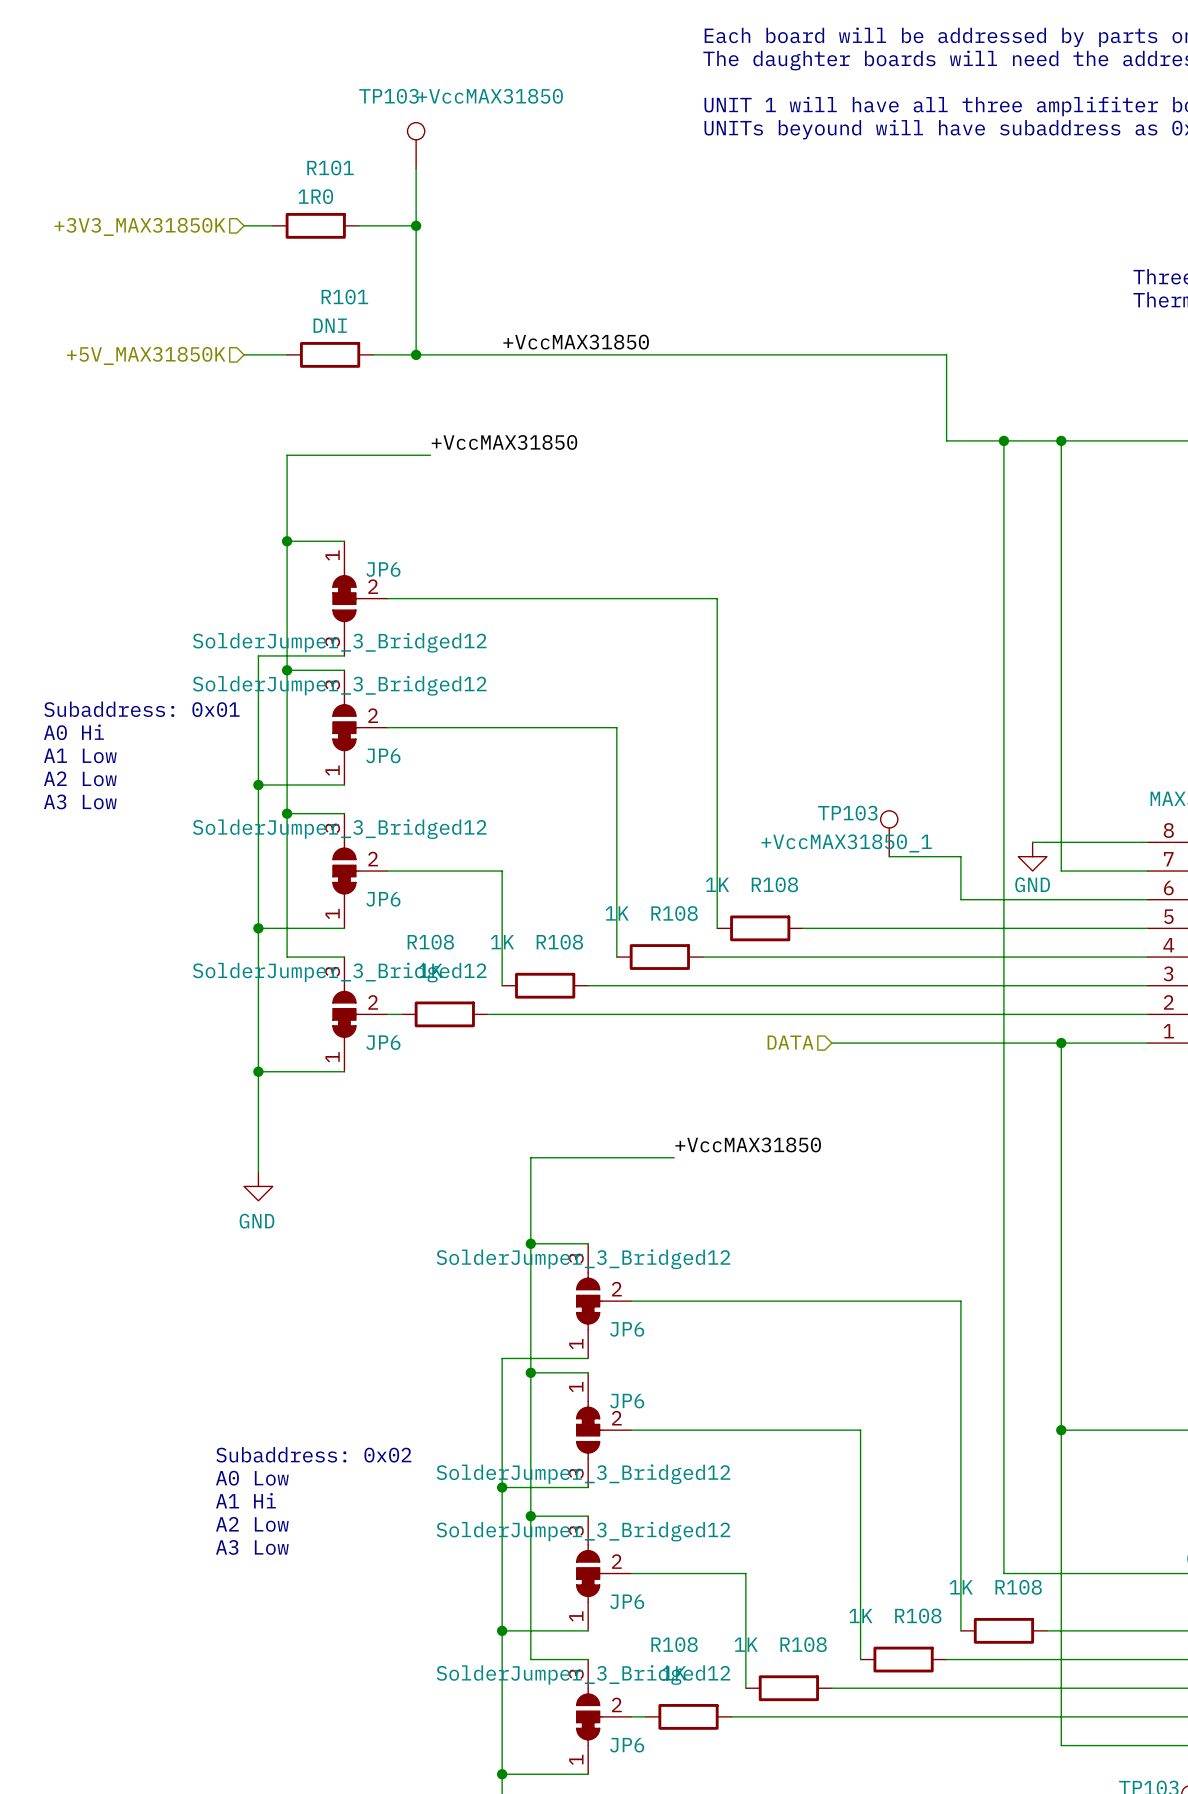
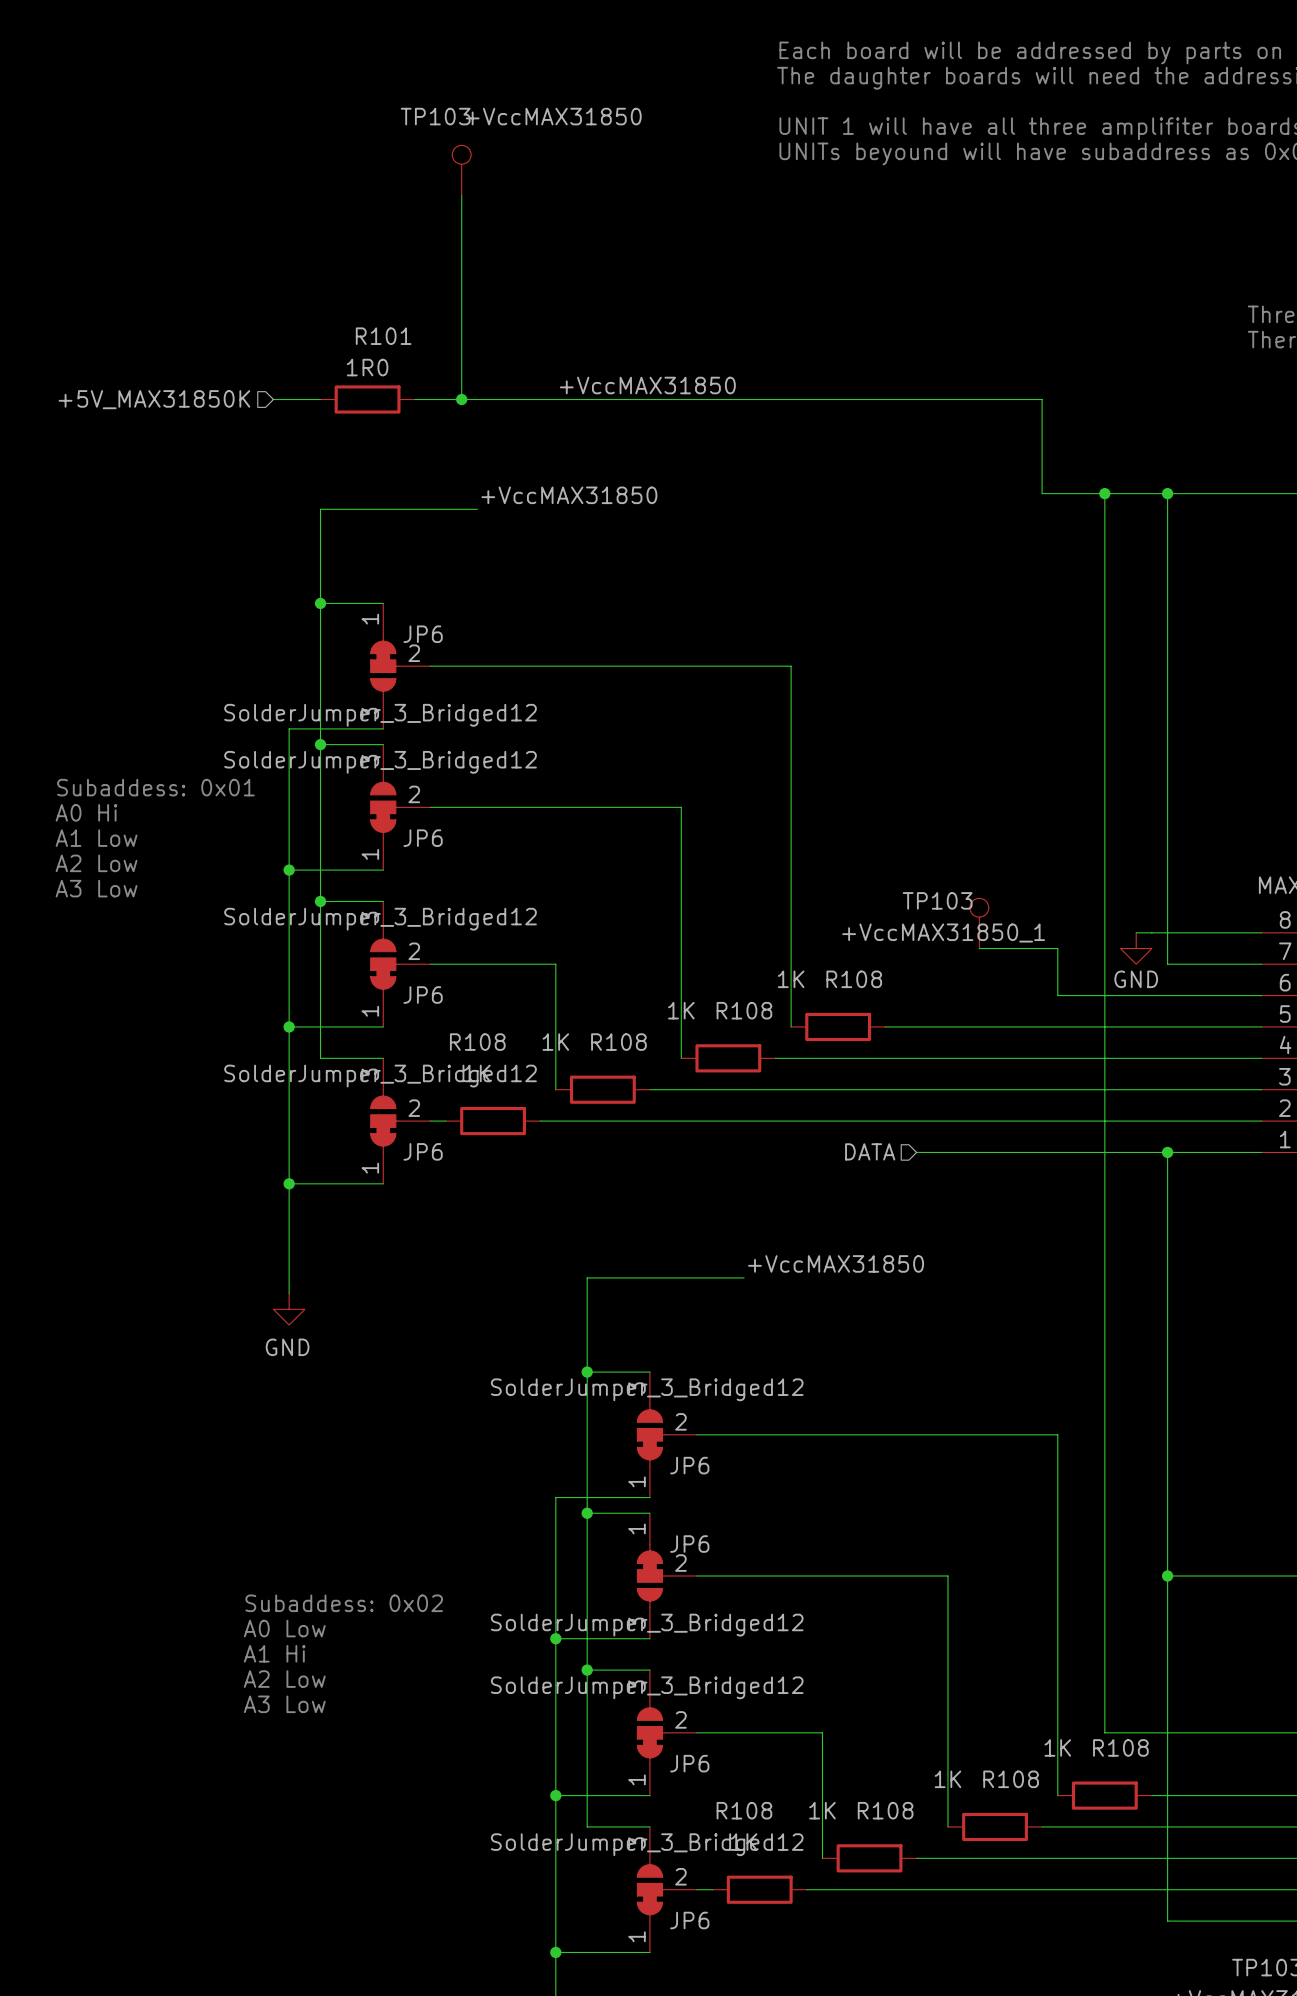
wire: (244, 225) (272, 225) -> none
R101: 1R0 (315, 225) -> none
wire: (358, 225) (416, 225) -> none
junction: (416, 225) -> none
hierarchical label: +3V3_MAX31850K (140, 226) -> none
R101 value: DNI (330, 325) -> 1R0 (367, 367)
text: Subaddress: 0x01 (141, 709) -> Subaddess: 0x01 (155, 787)
text: Subaddress: 0x02 (313, 1454) -> Subaddess: 0x02 (344, 1603)

